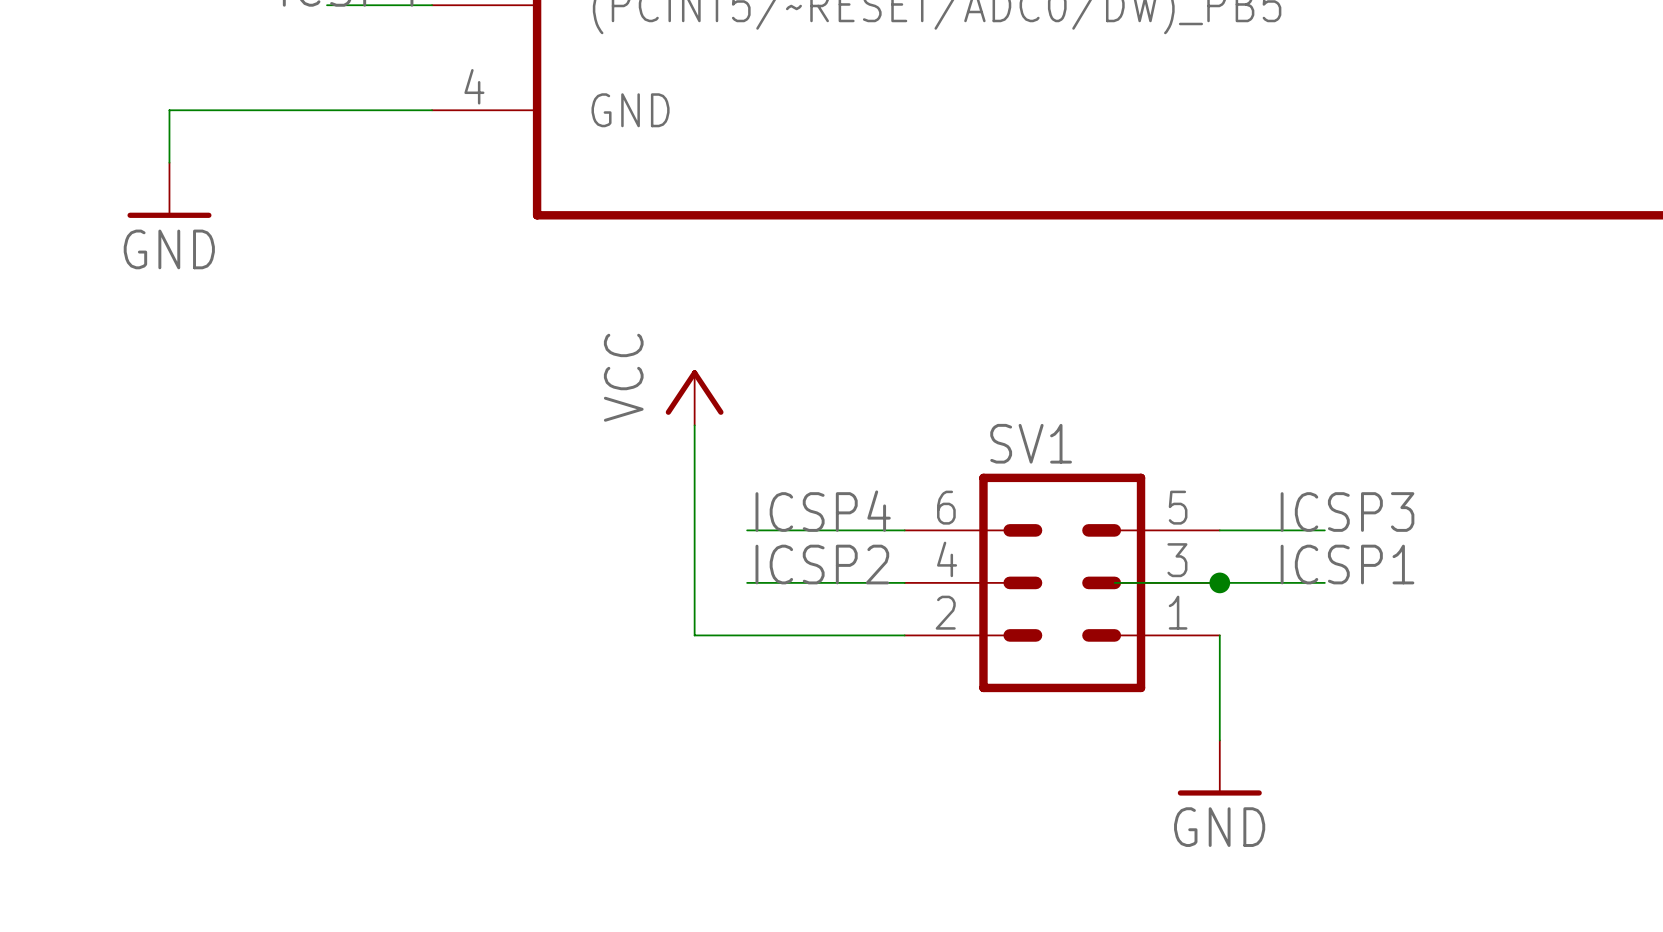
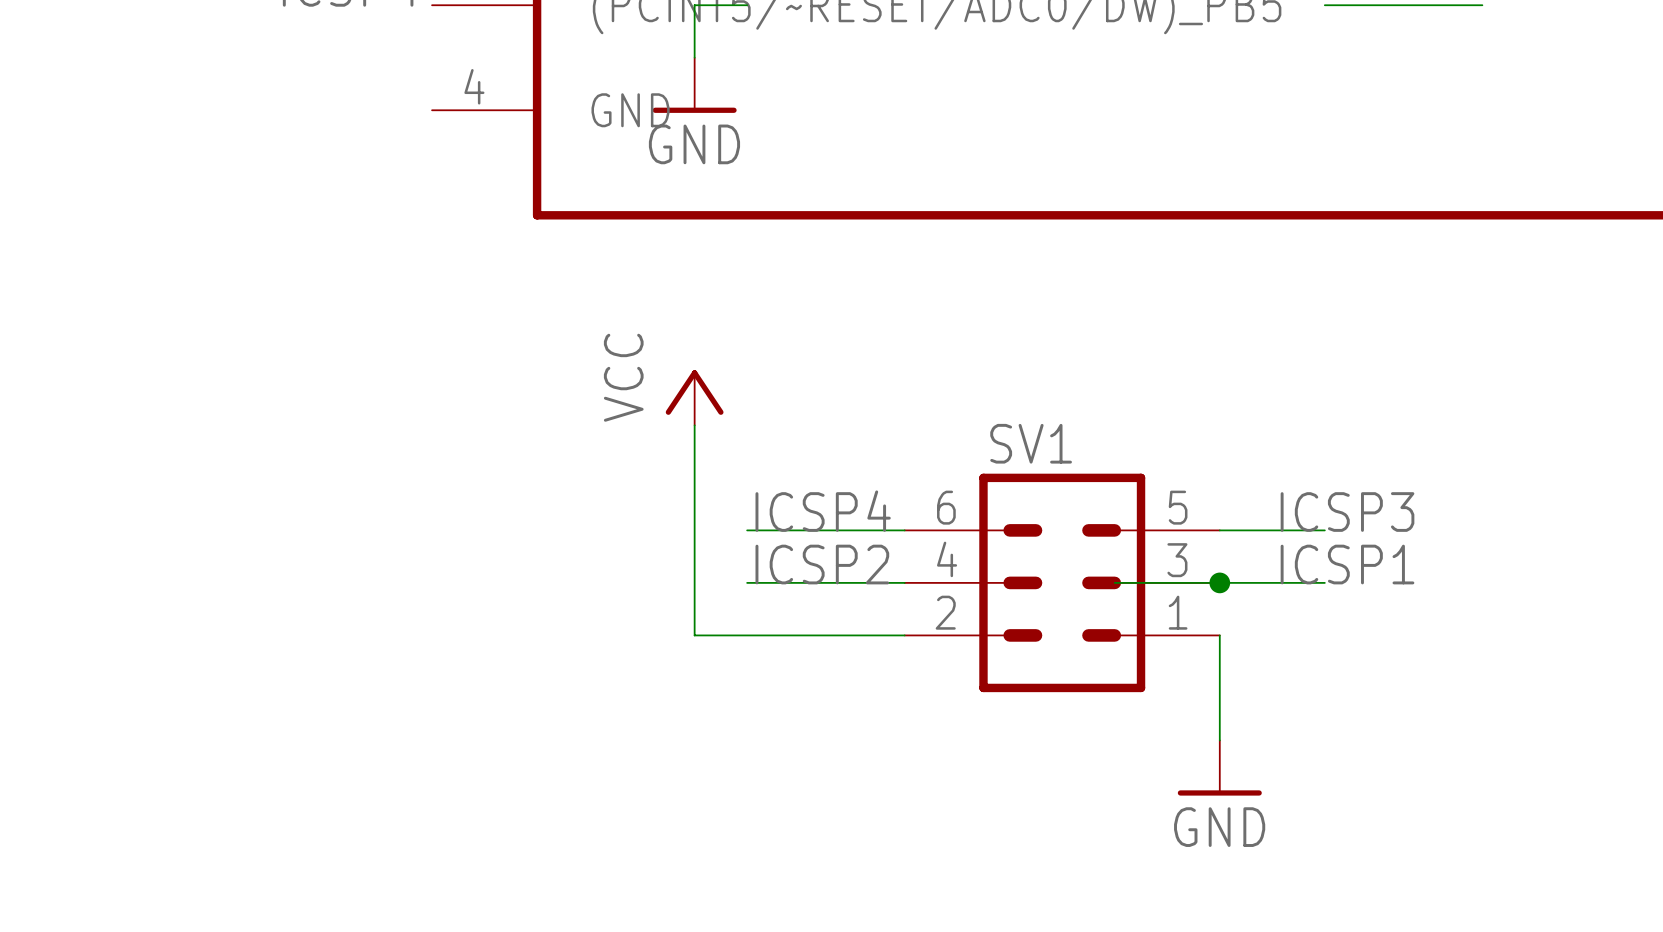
wire: (327, 5) (432, 5) -> none
wire: none -> (747, 5) (694, 5) (694, 57)
wire: none -> (1324, 5) (1482, 5)
power symbol: none -> GND (694, 85)
wire: (432, 110) (169, 110) (169, 162) -> none
power symbol: GND (169, 190) -> none

